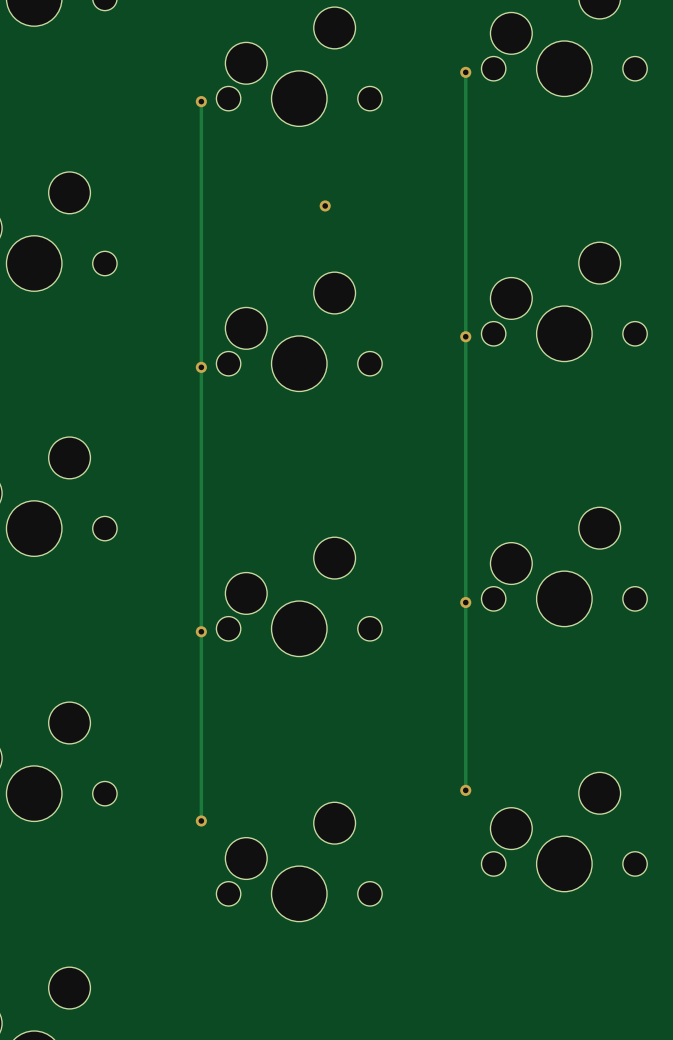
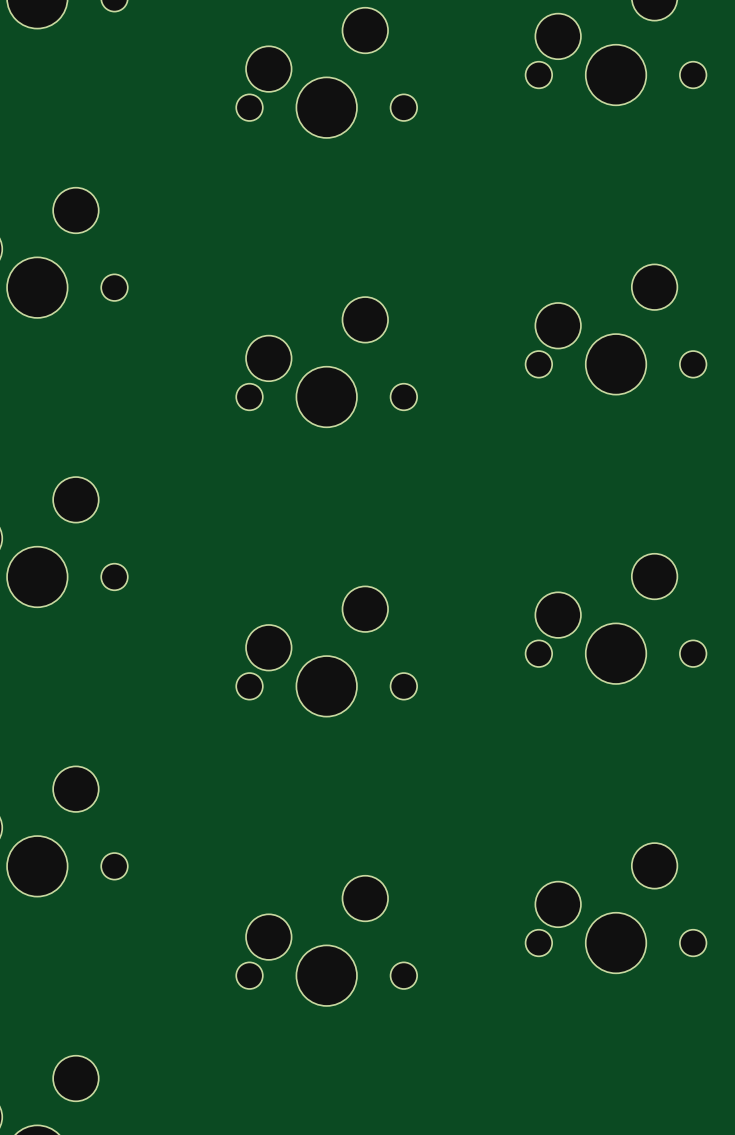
track: (465, 72) (465, 790) -> none
via: (465, 72) -> none
track: (201, 101) (201, 820) -> none
via: (201, 101) -> none
via: (325, 205) -> none
via: (465, 336) -> none
via: (201, 367) -> none
via: (465, 602) -> none
via: (201, 631) -> none
via: (465, 790) -> none
via: (201, 820) -> none

